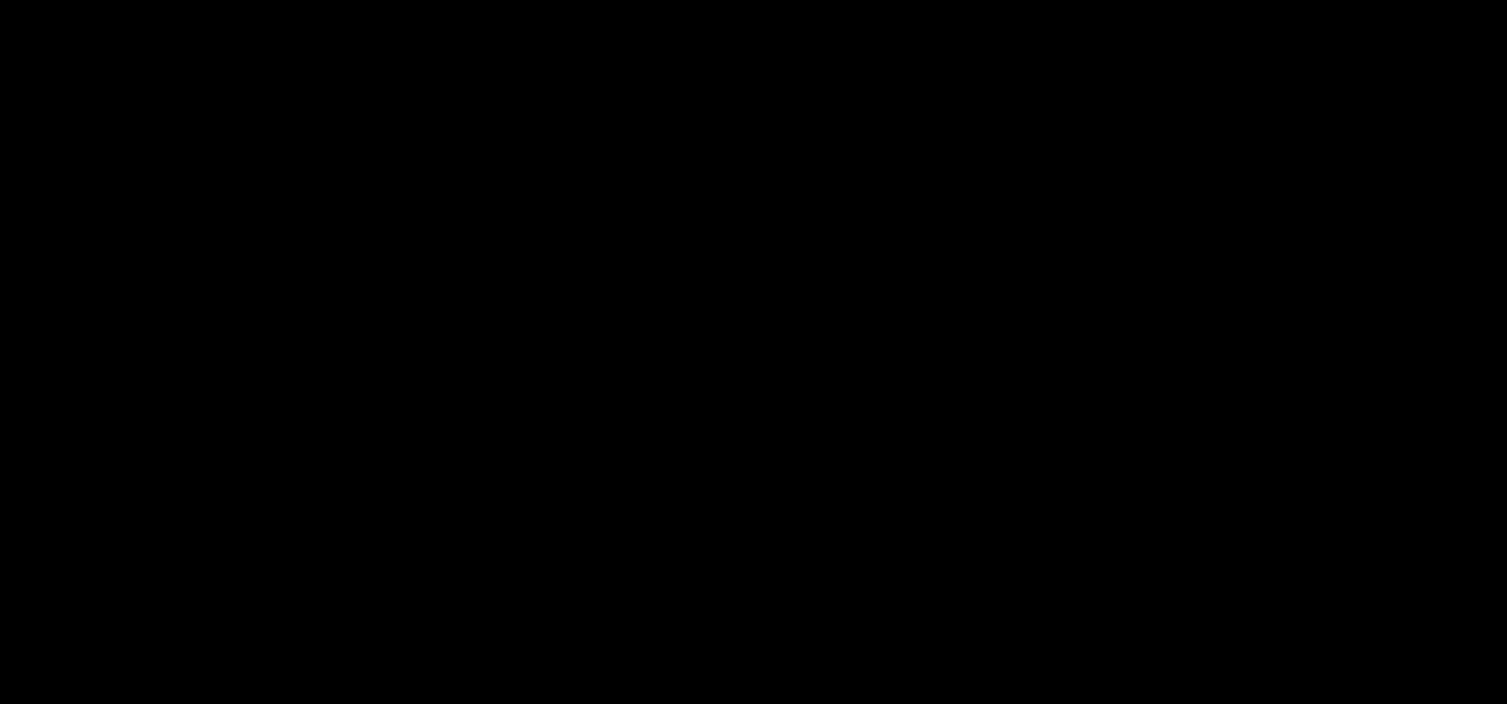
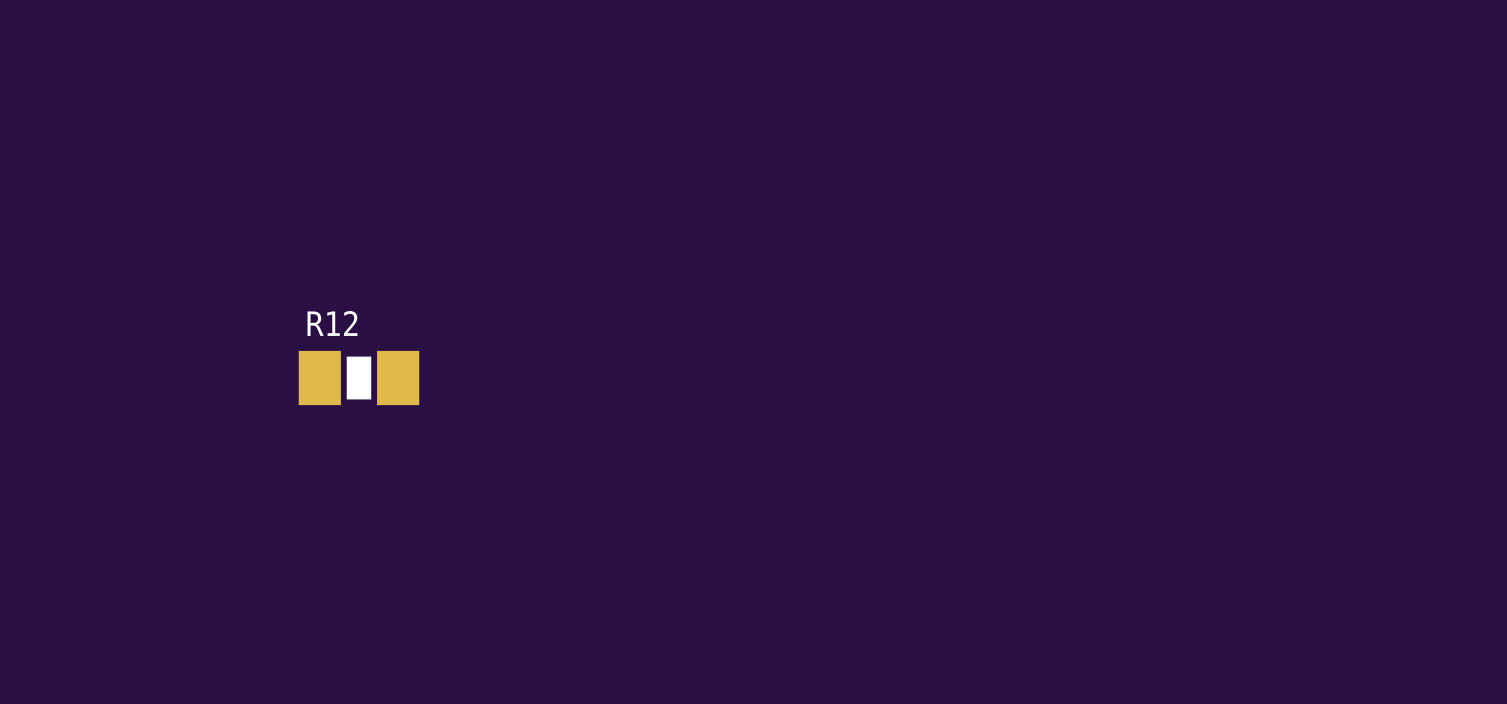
R12: none -> (358, 378)

